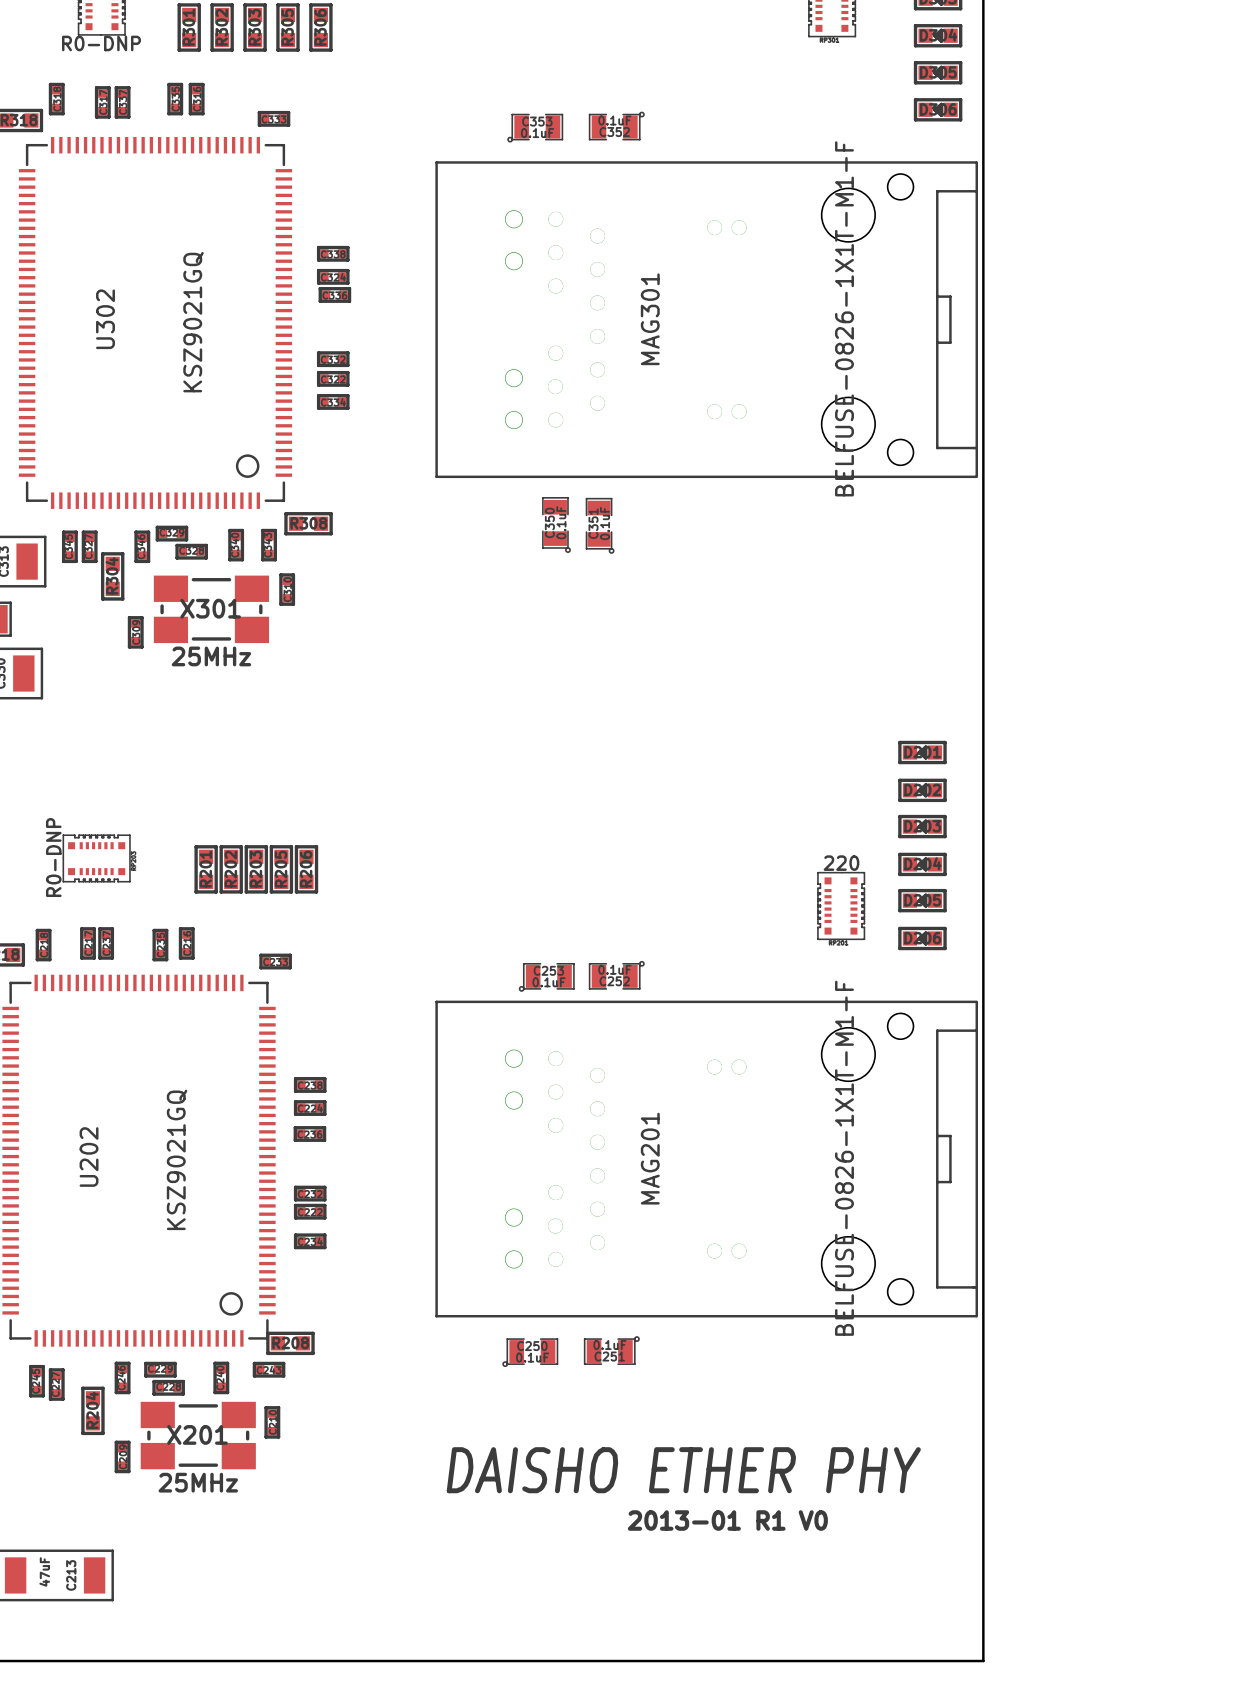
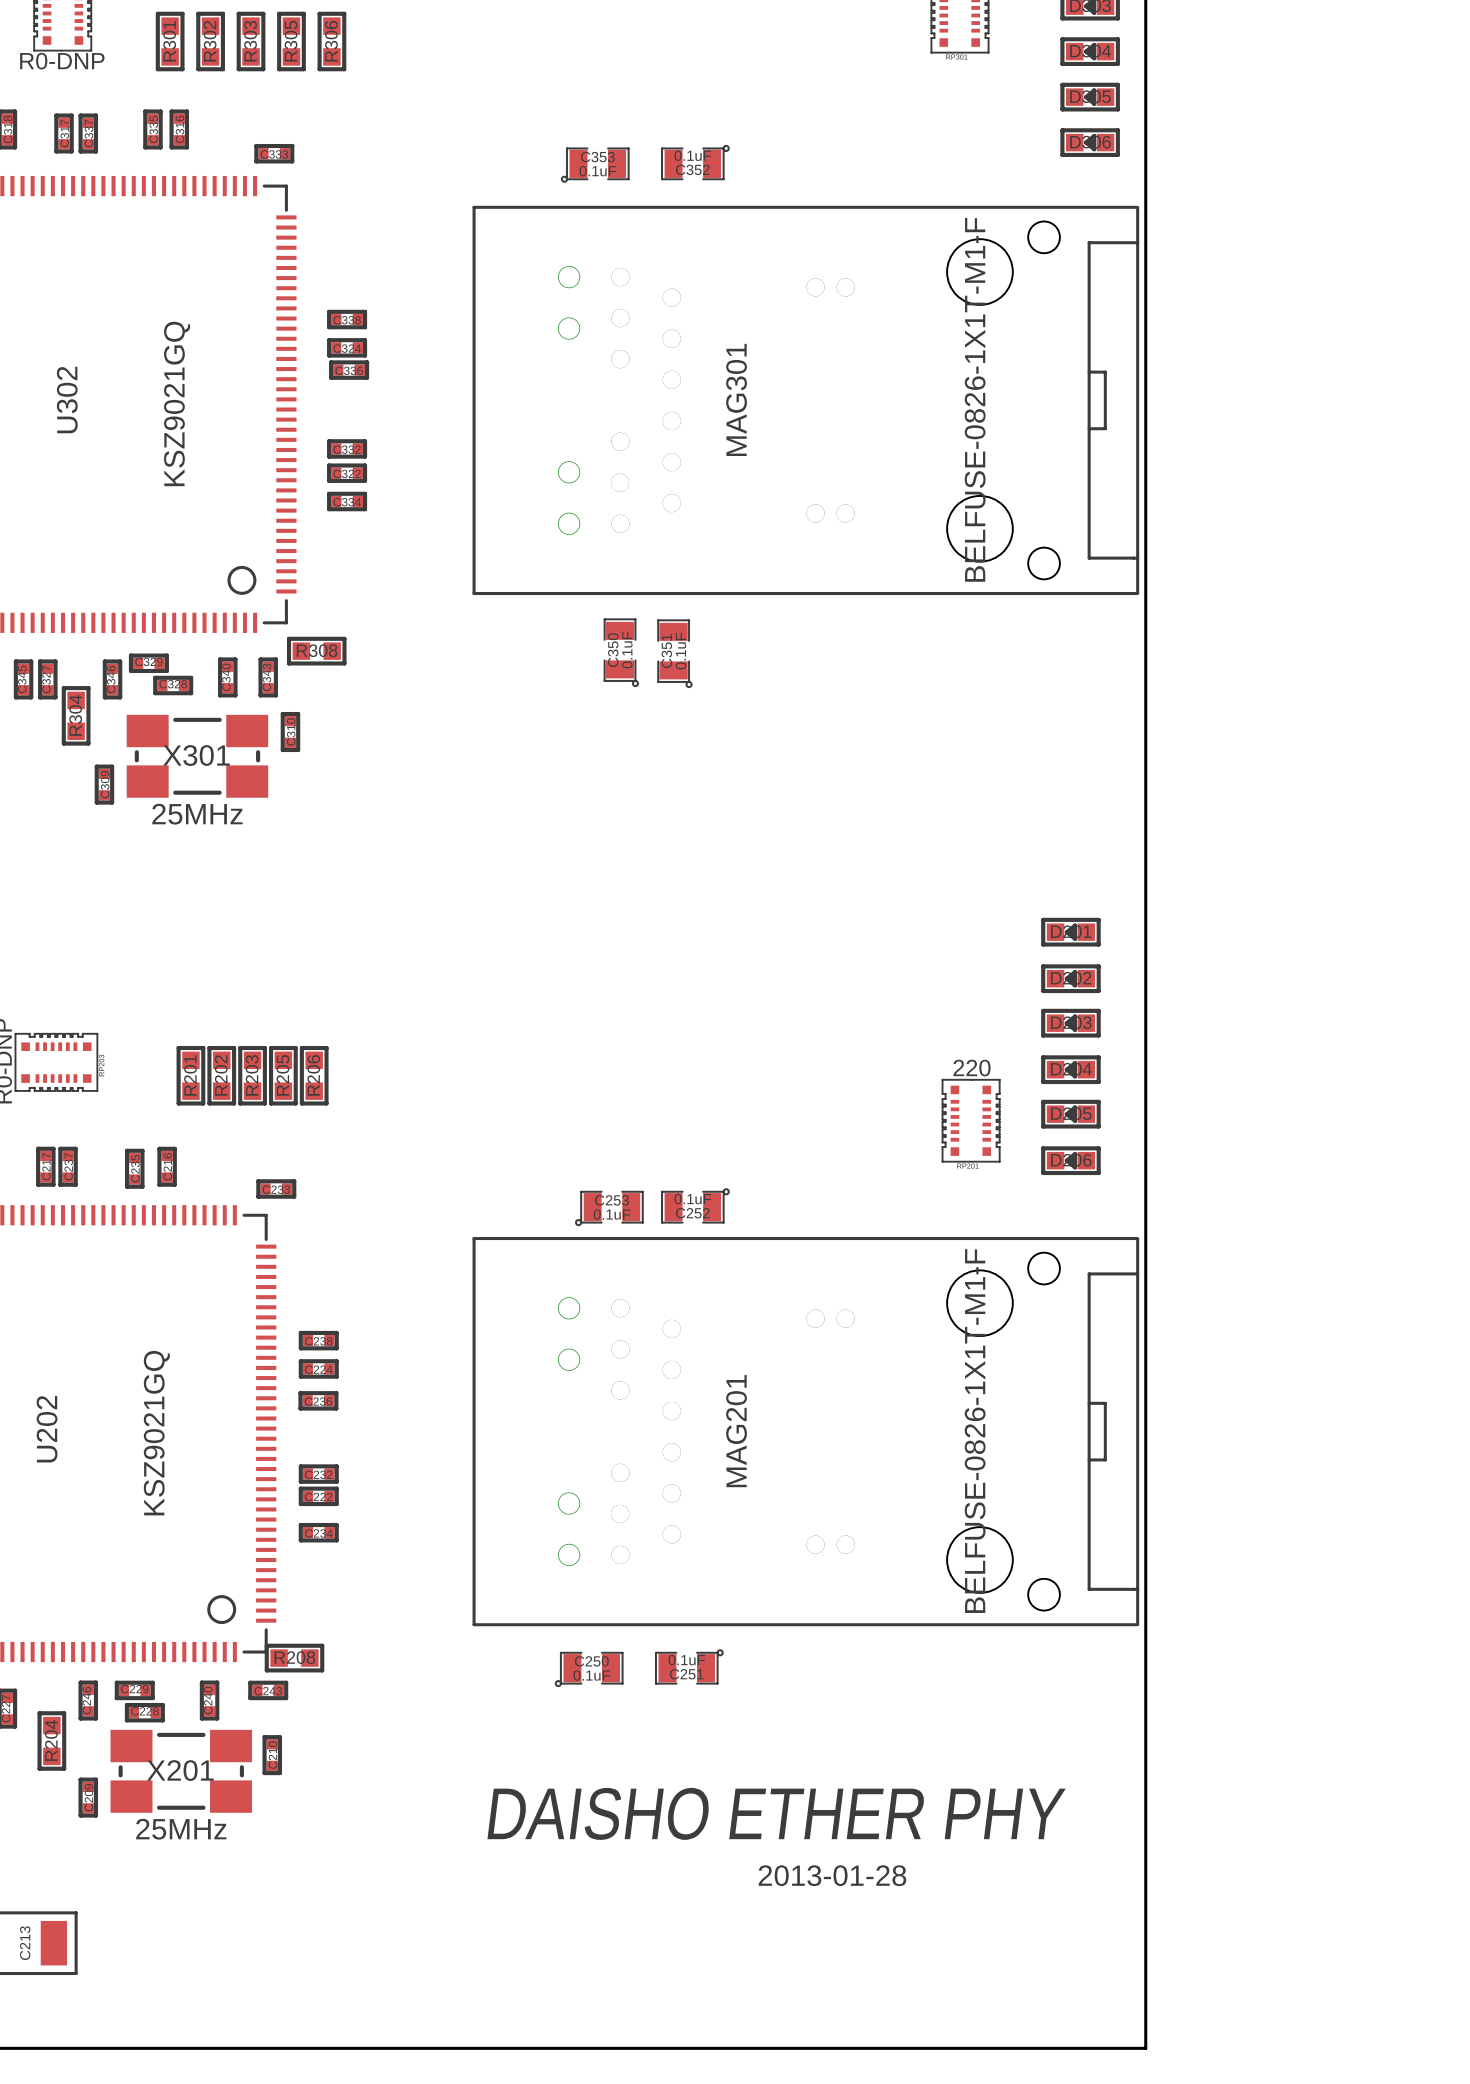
text: 2013-01 R1 V0 (727, 1520) -> 2013-01-28 (832, 1875)

